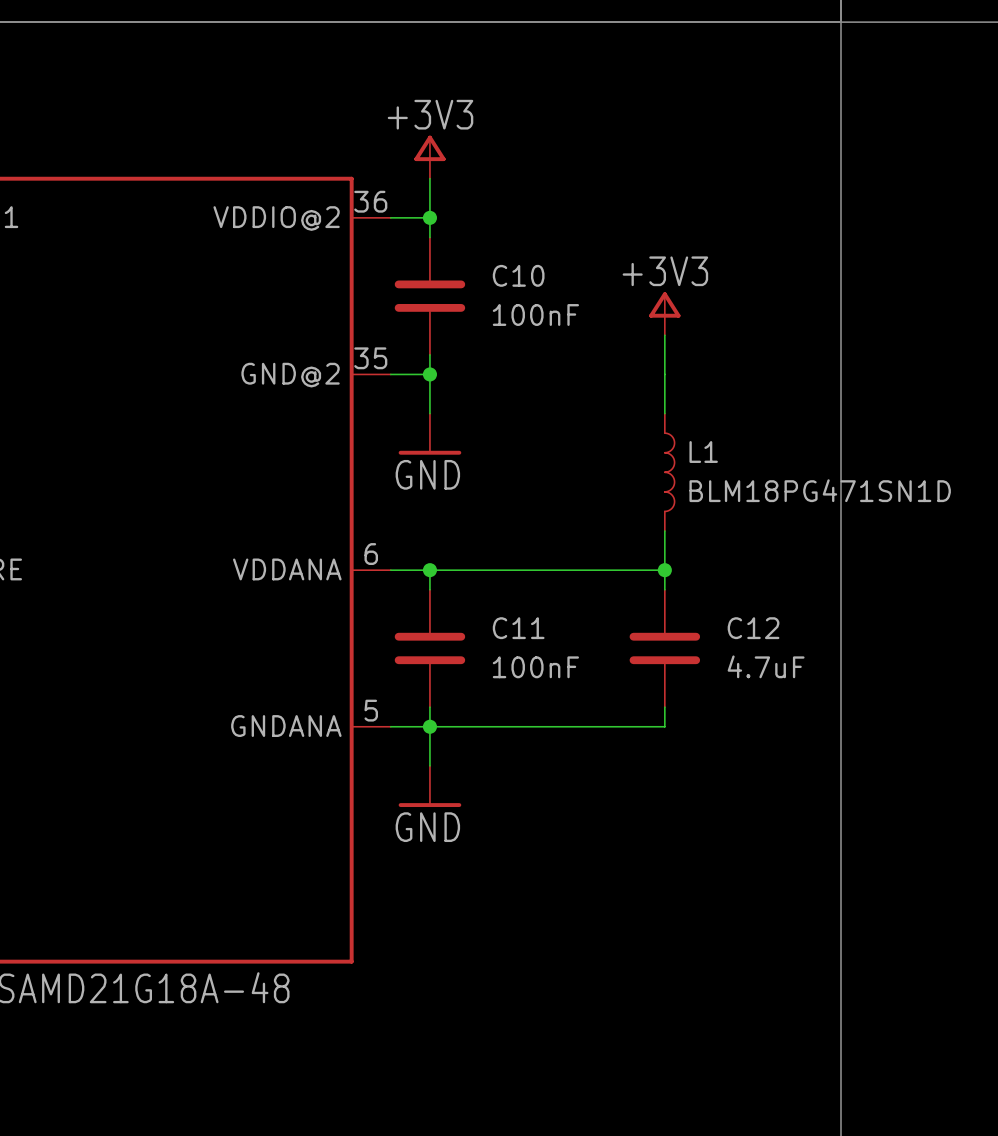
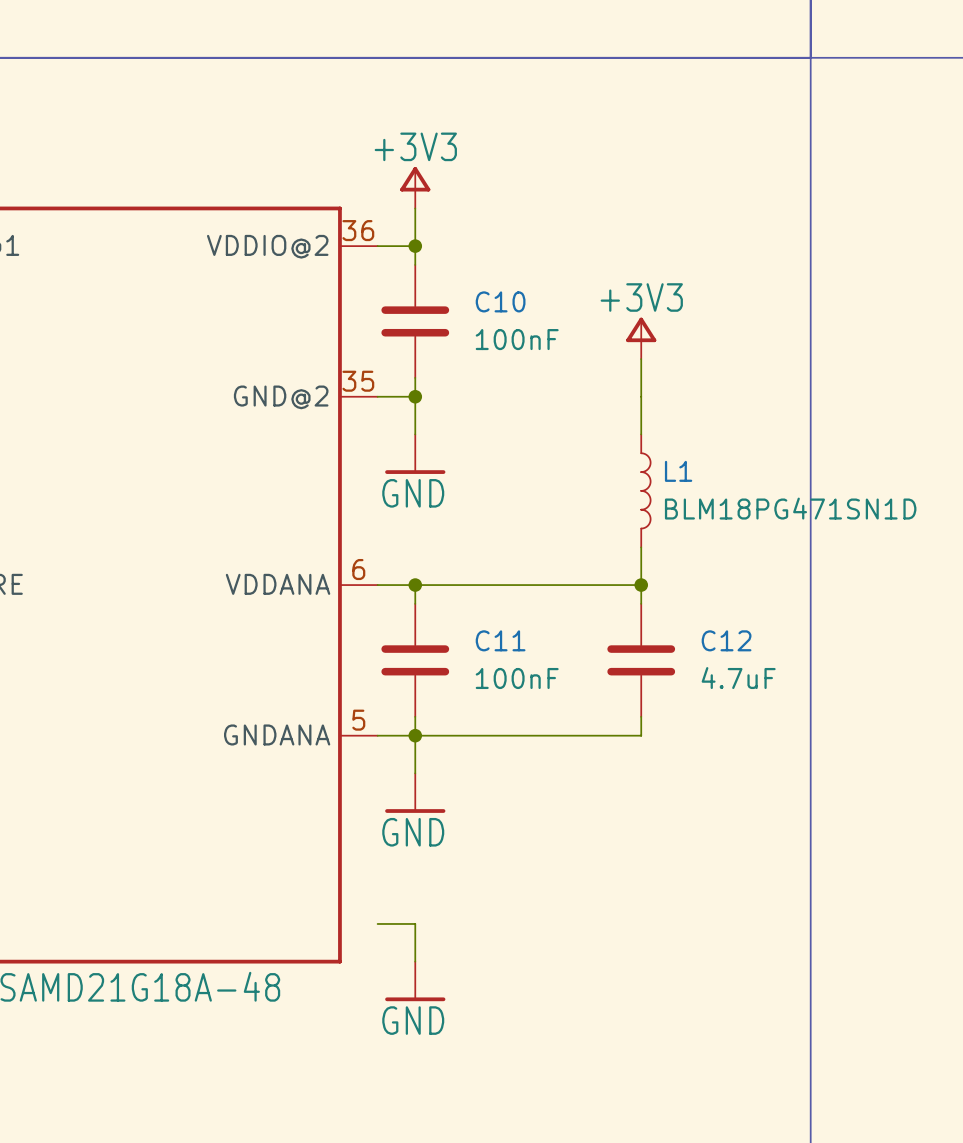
wire: none -> (377, 923) (415, 923) (415, 961)
power symbol: none -> GND (415, 981)

